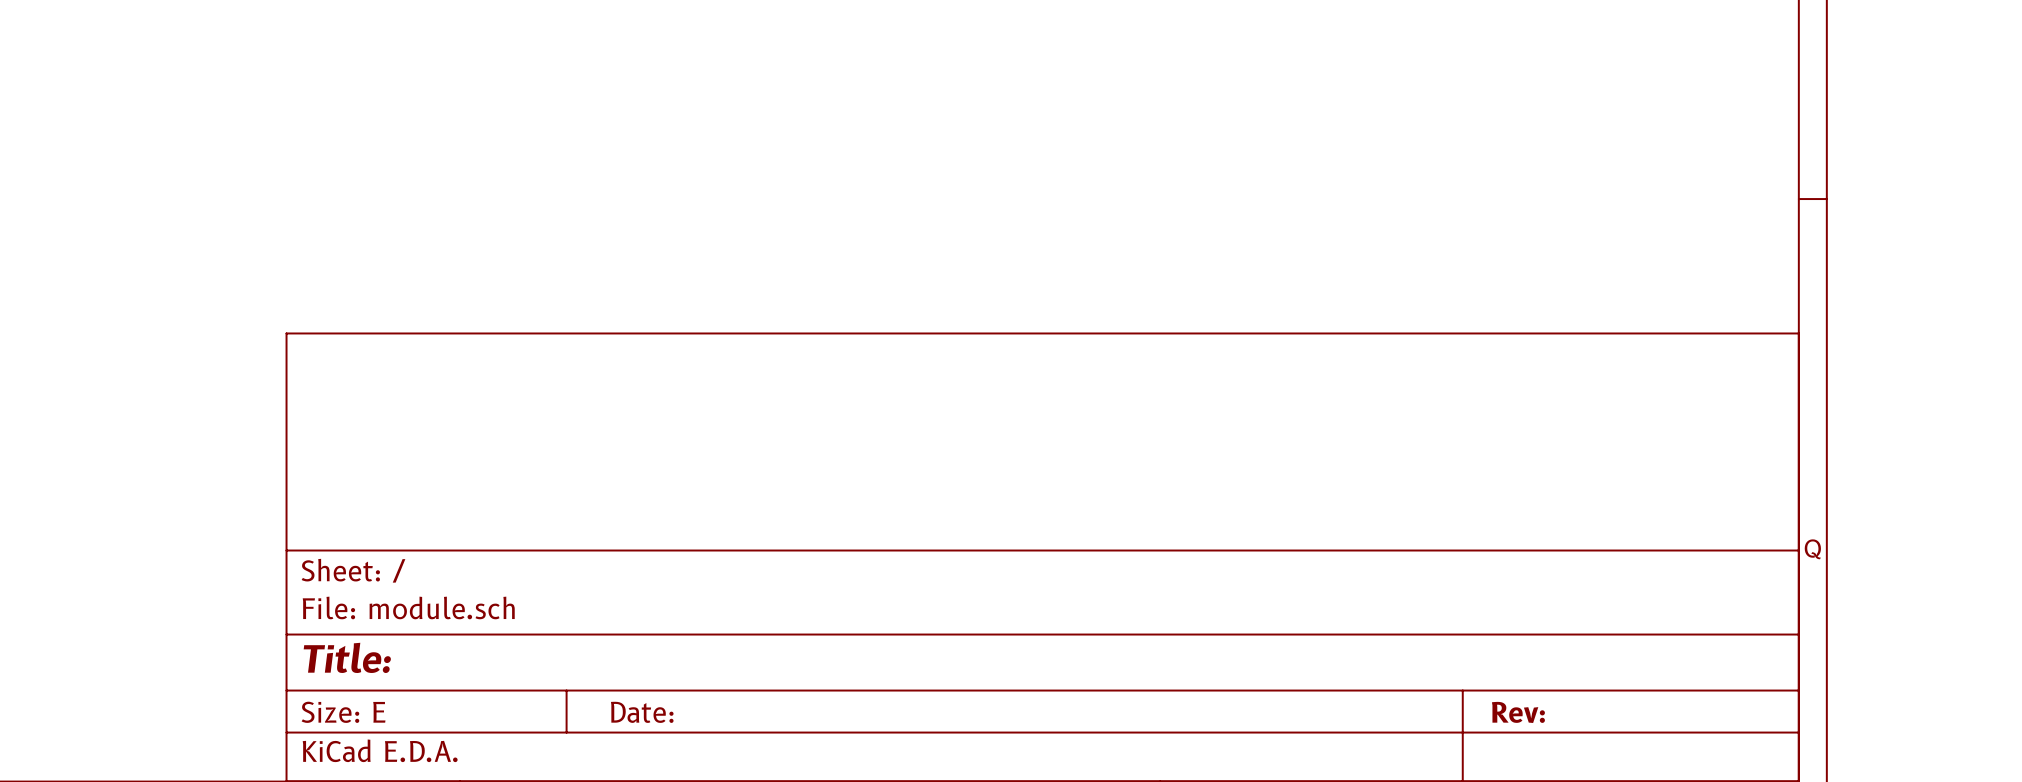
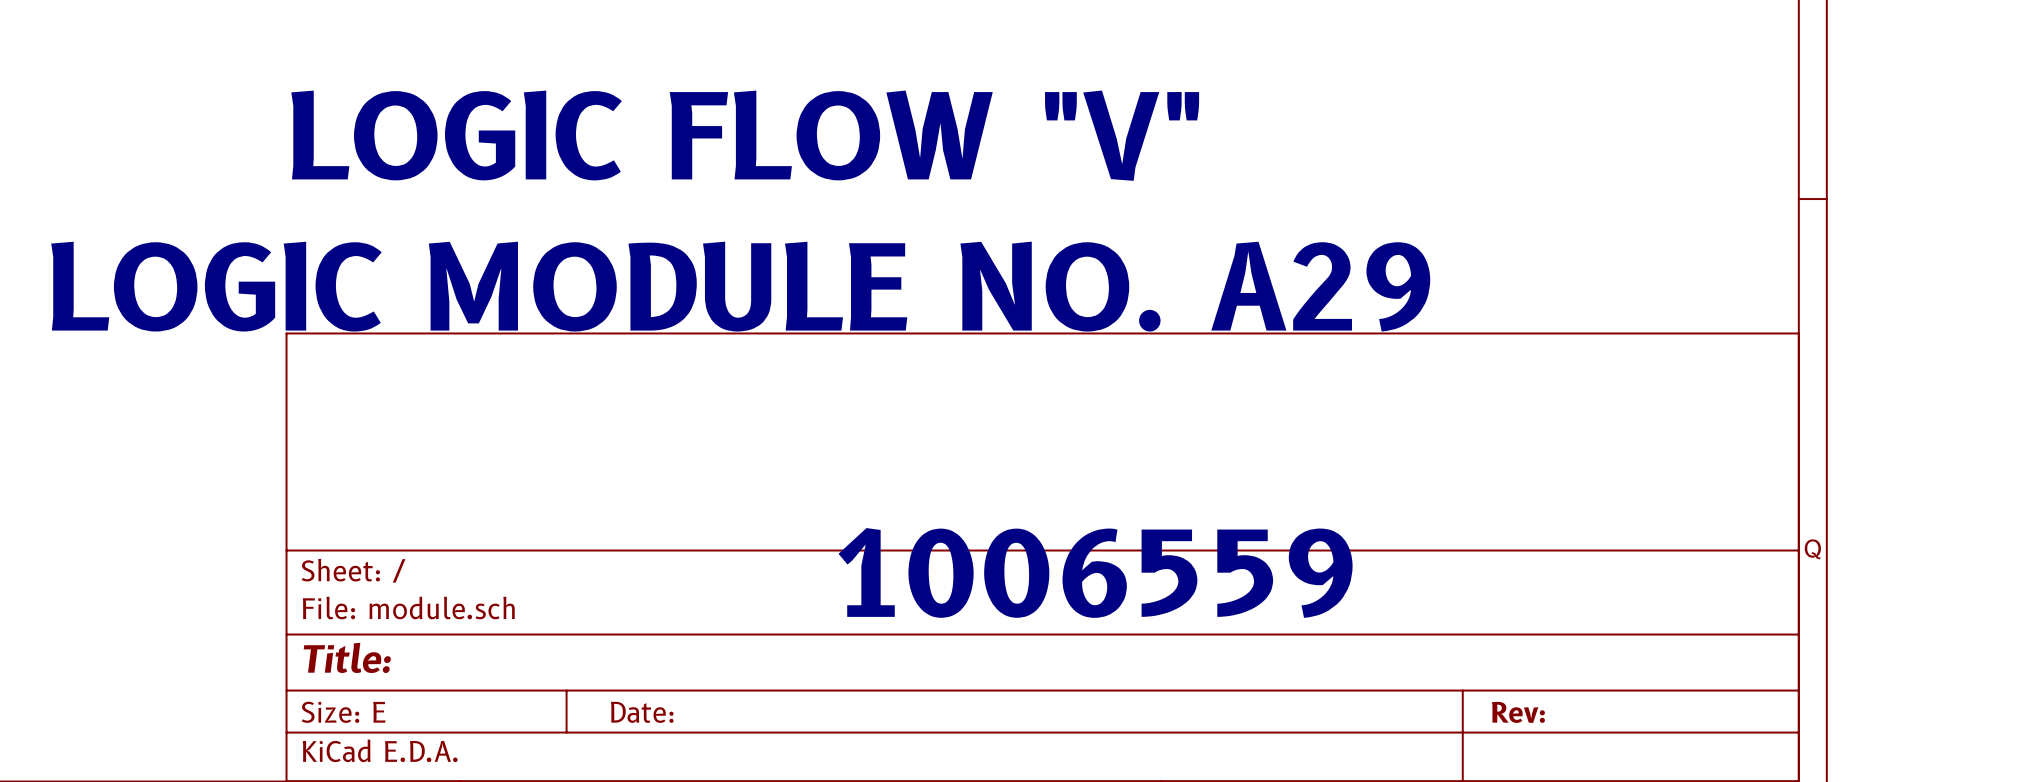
text: none -> LOGIC FLOW "V" (745, 135)
text: none -> LOGIC MODULE NO. A29 (740, 286)
text: none -> 1006559 (1095, 572)

